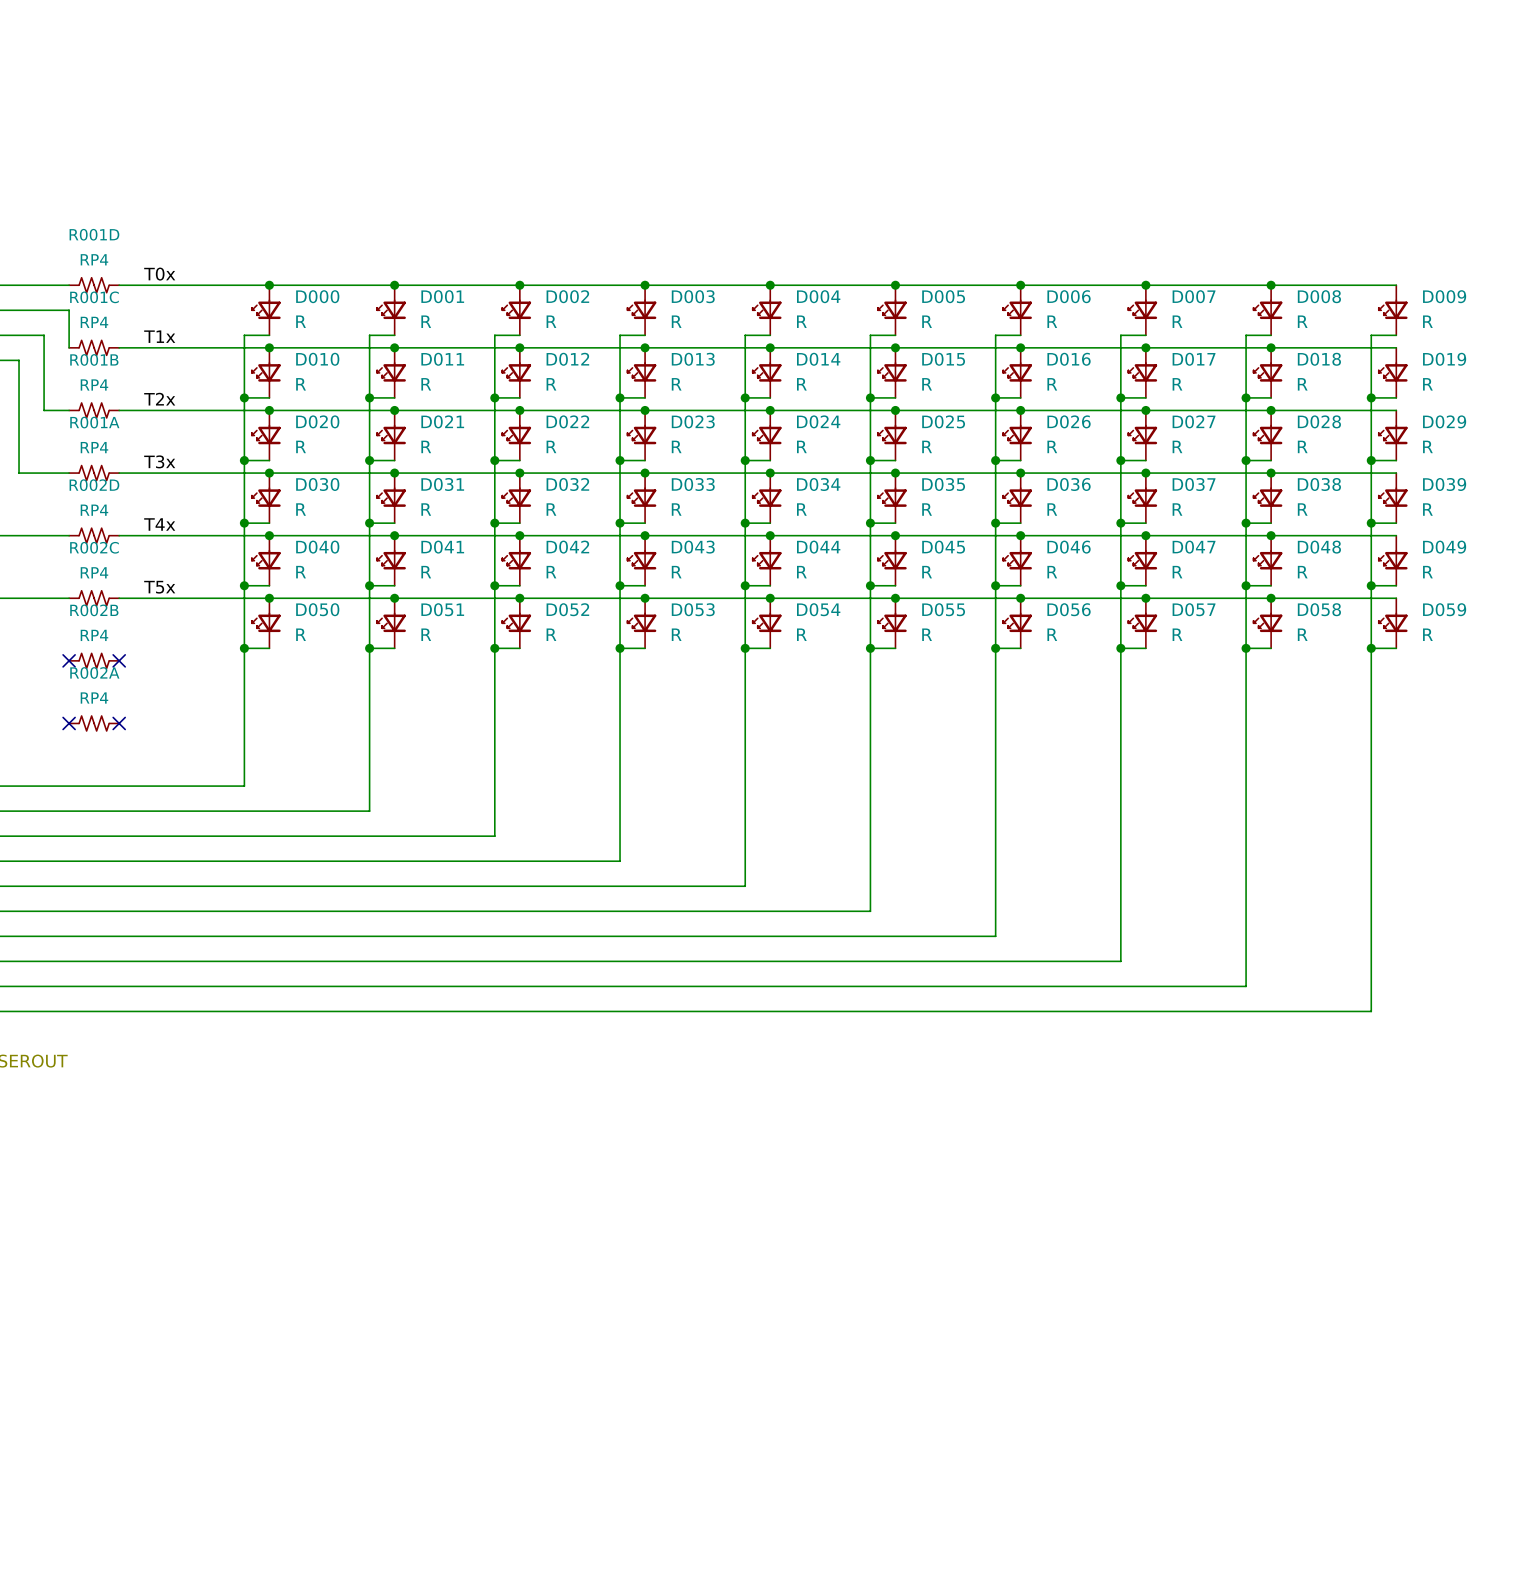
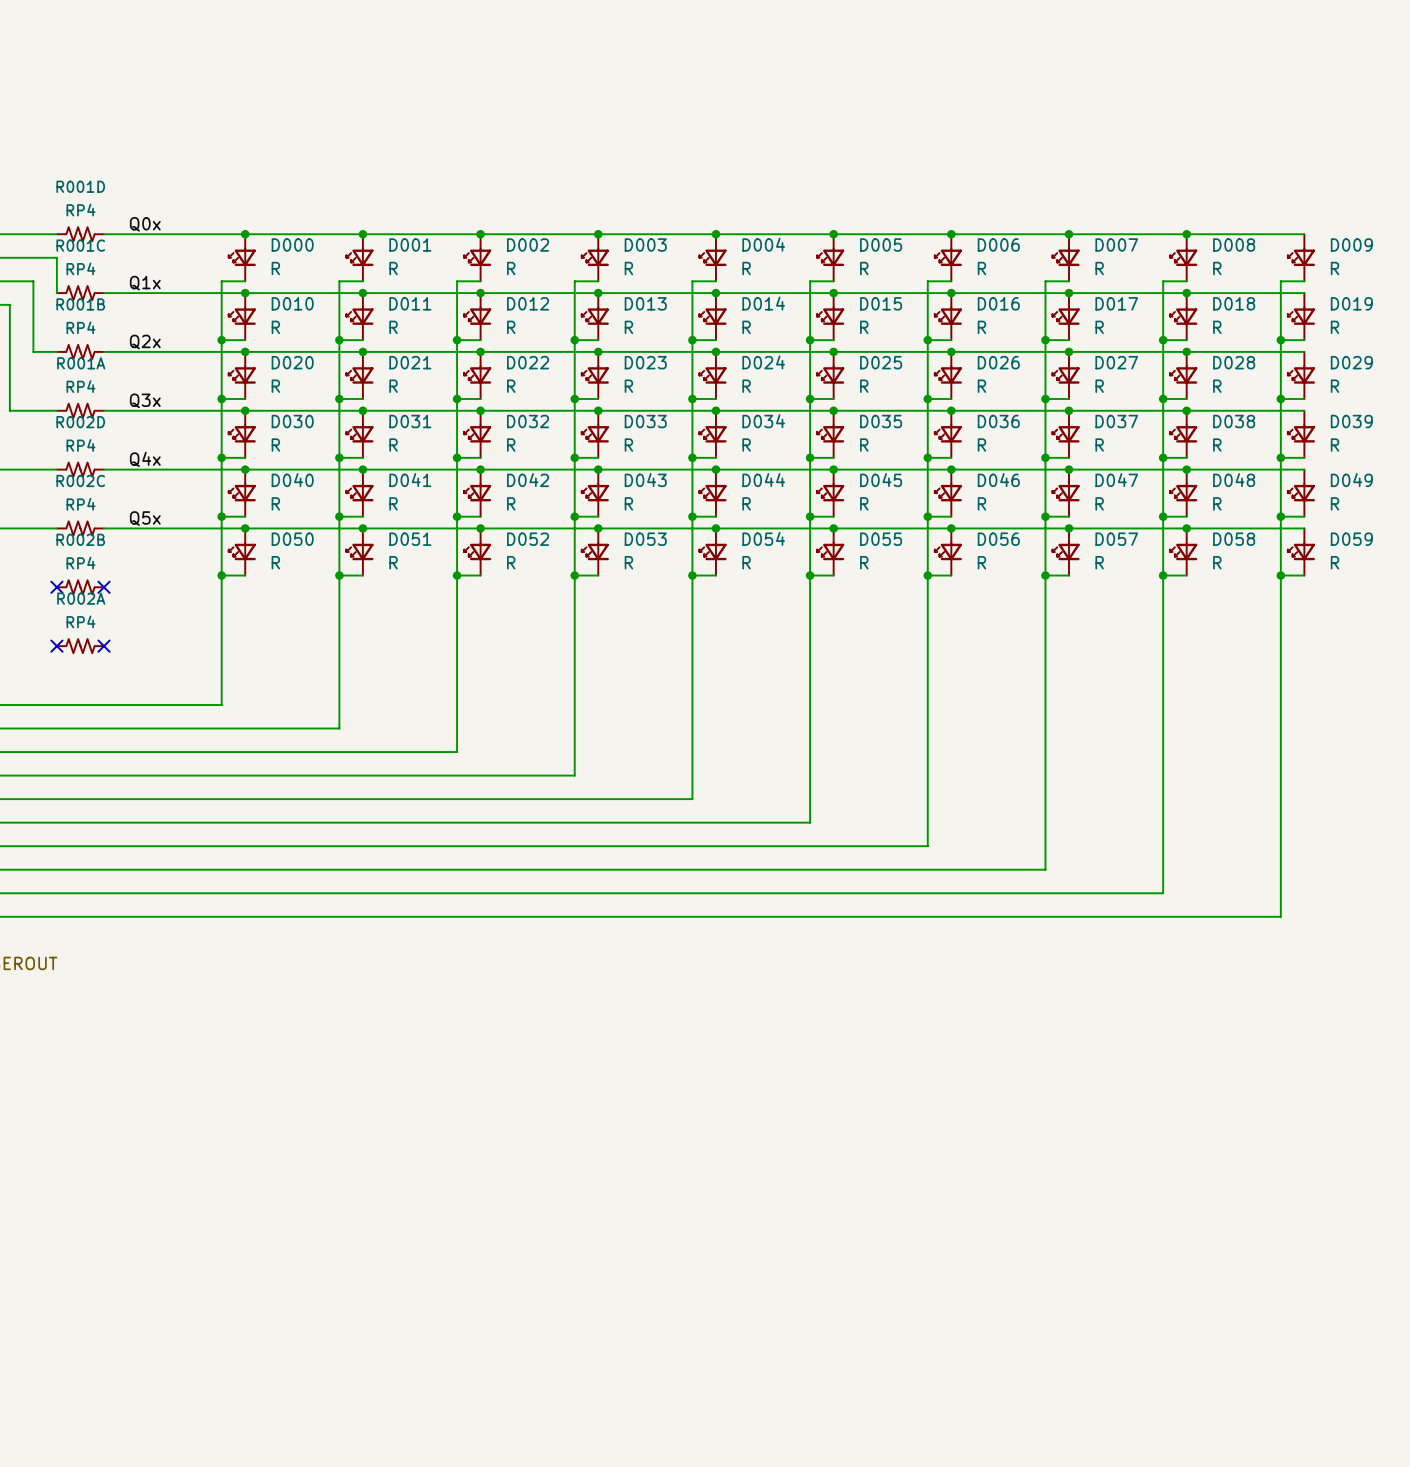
label: T0x (159, 274) -> Q0x (145, 224)
label: T1x (159, 336) -> Q1x (145, 283)
label: T2x (159, 399) -> Q2x (145, 341)
label: T3x (159, 461) -> Q3x (145, 400)
label: T4x (159, 524) -> Q4x (145, 459)
label: T5x (159, 587) -> Q5x (145, 518)

